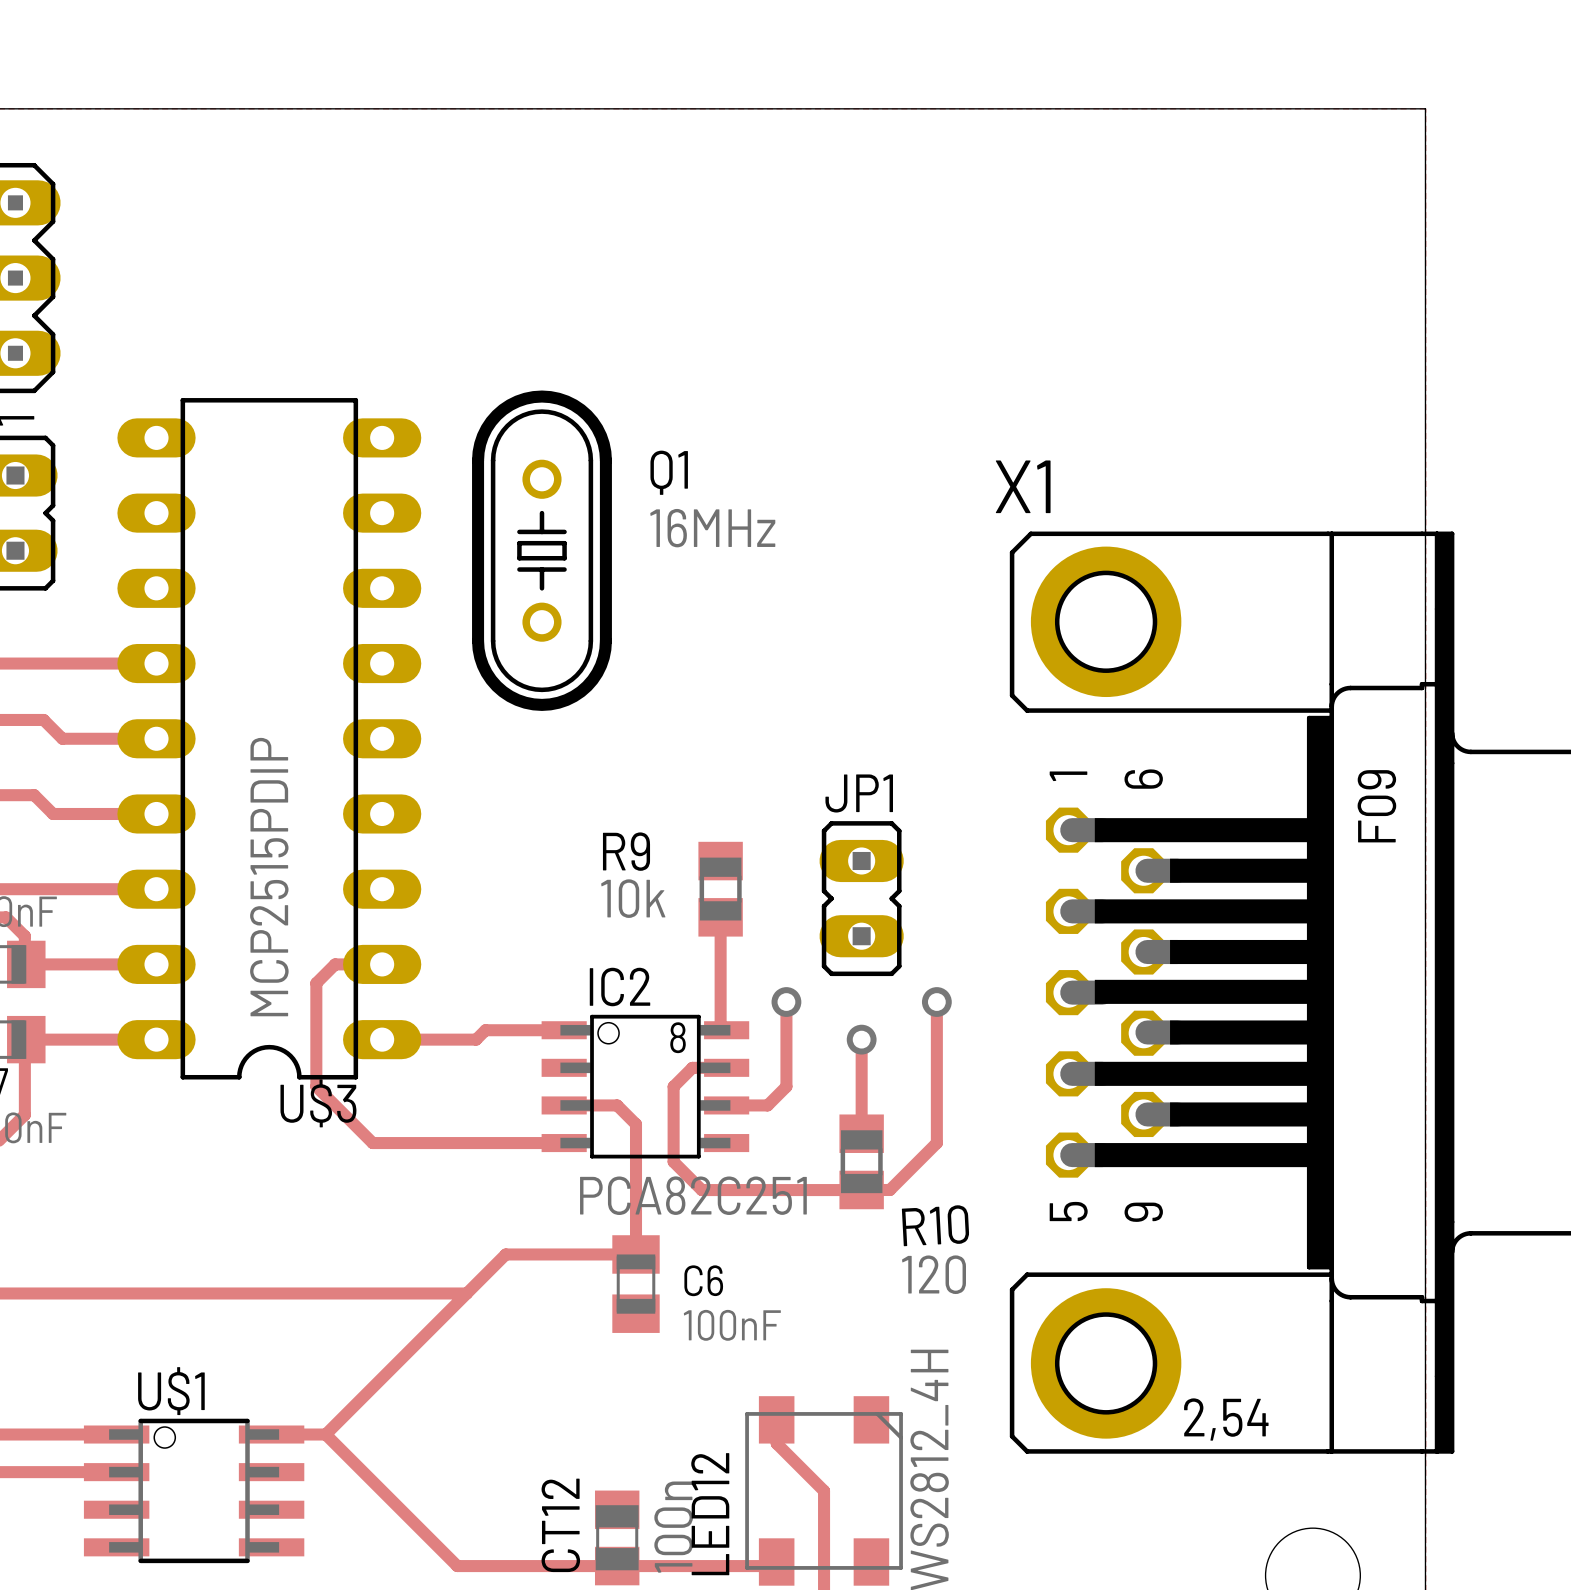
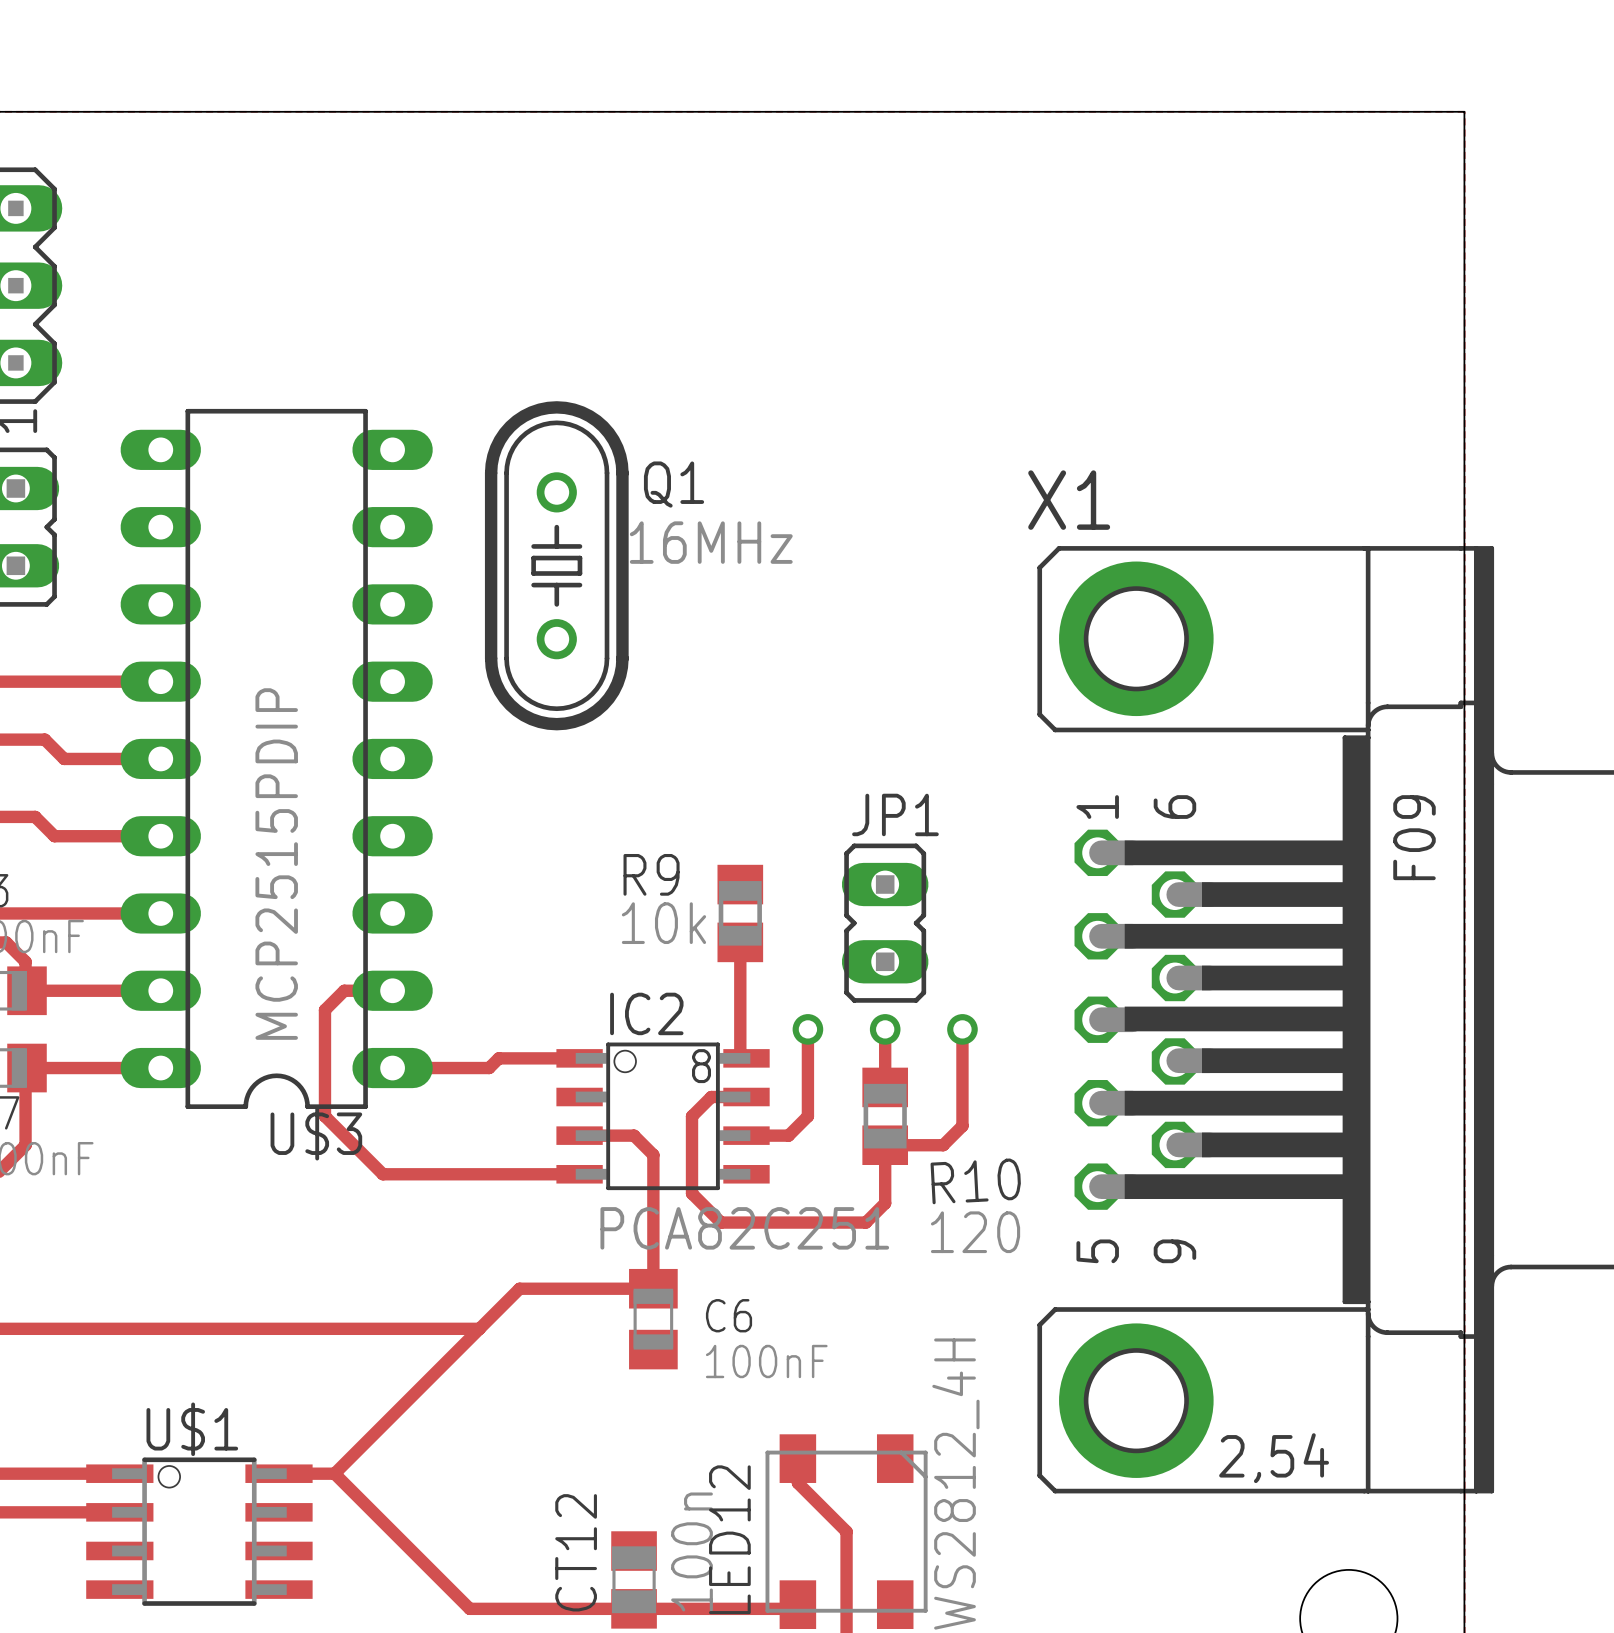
track: none -> (885, 1029) (885, 1068)
via position: (861, 1039) -> (885, 1029)
track: (861, 1058) (861, 1114) -> none
track: (936, 1096) (936, 1143) (889, 1189) (842, 1190) -> (962, 1125) (943, 1145) (885, 1145)
track: none -> (885, 1164) (885, 1203) (865, 1222)
R10 position: (861, 1161) -> (885, 1116)

